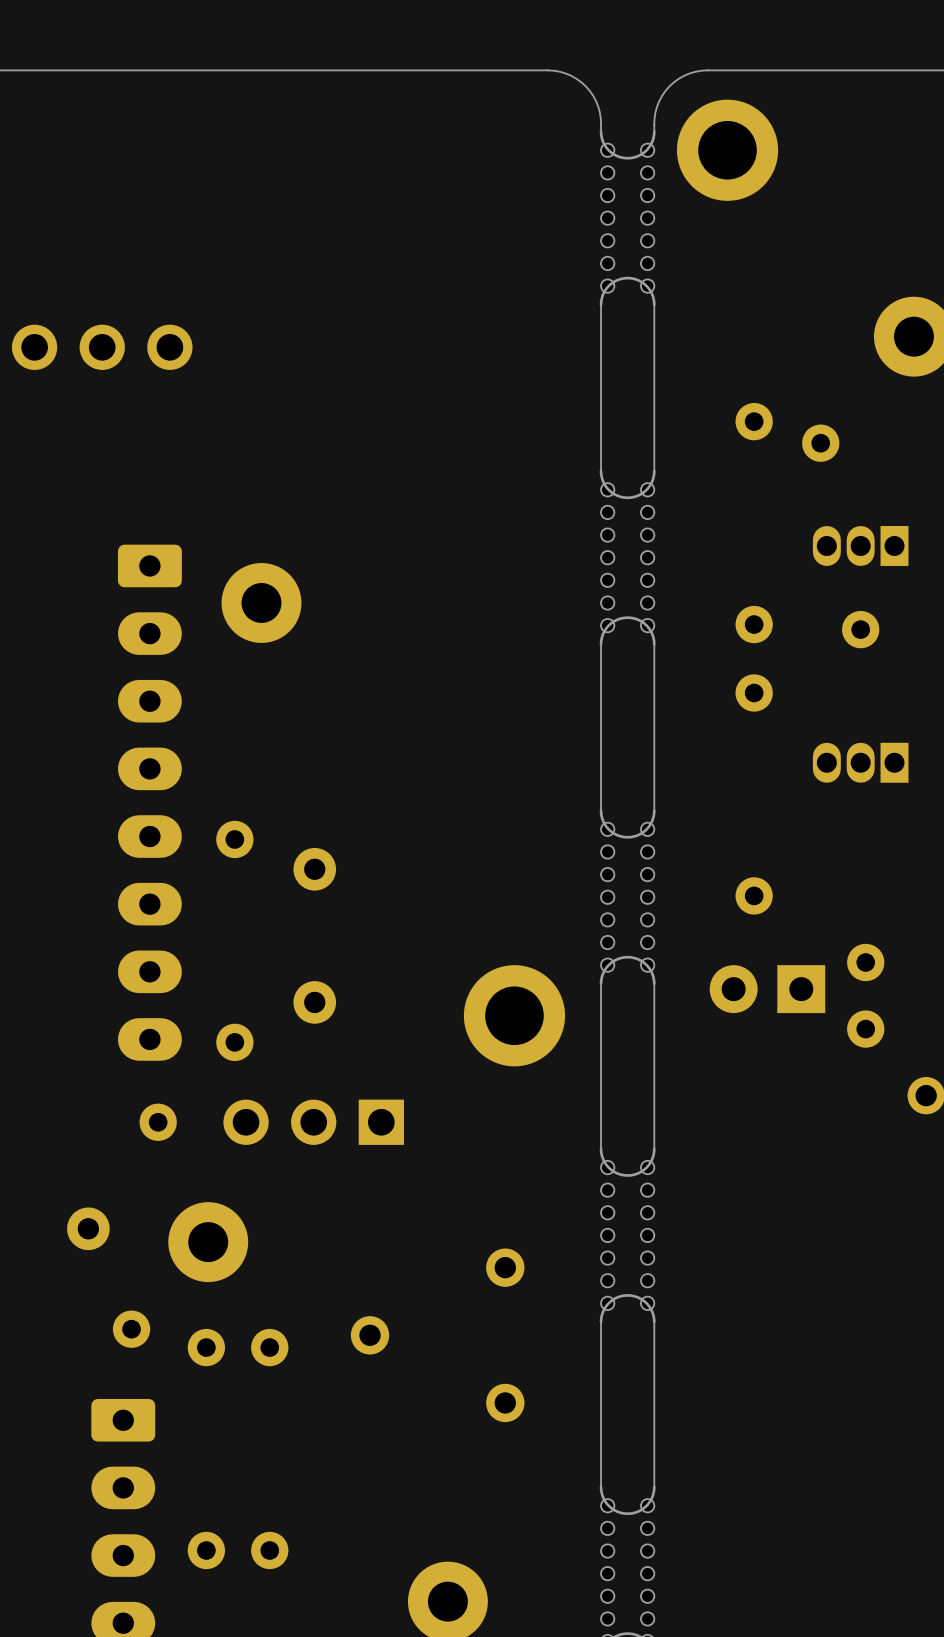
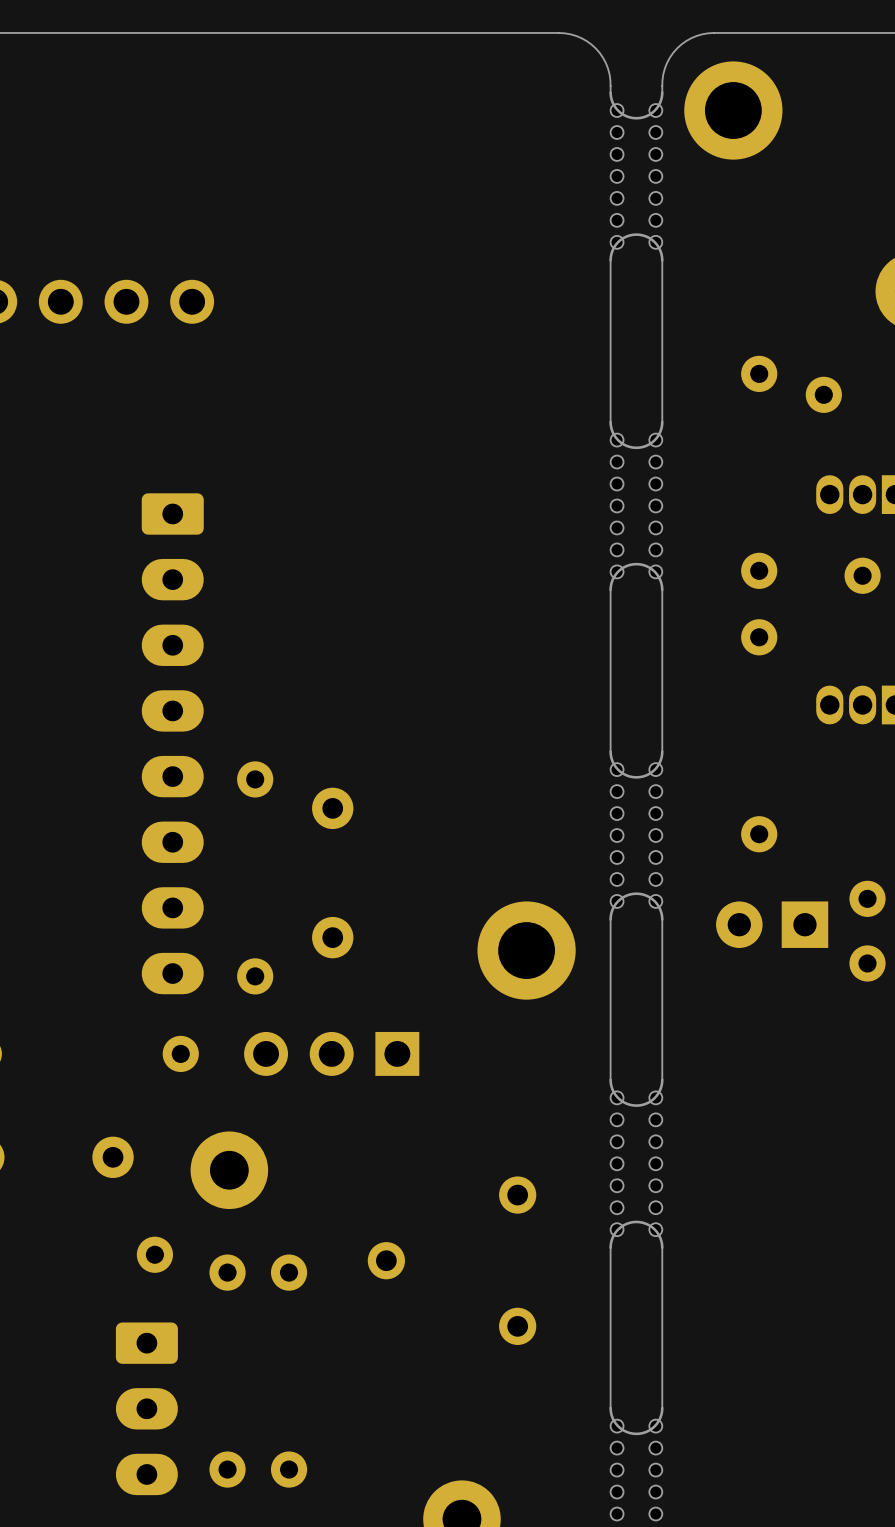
part: (261, 602) -> none

